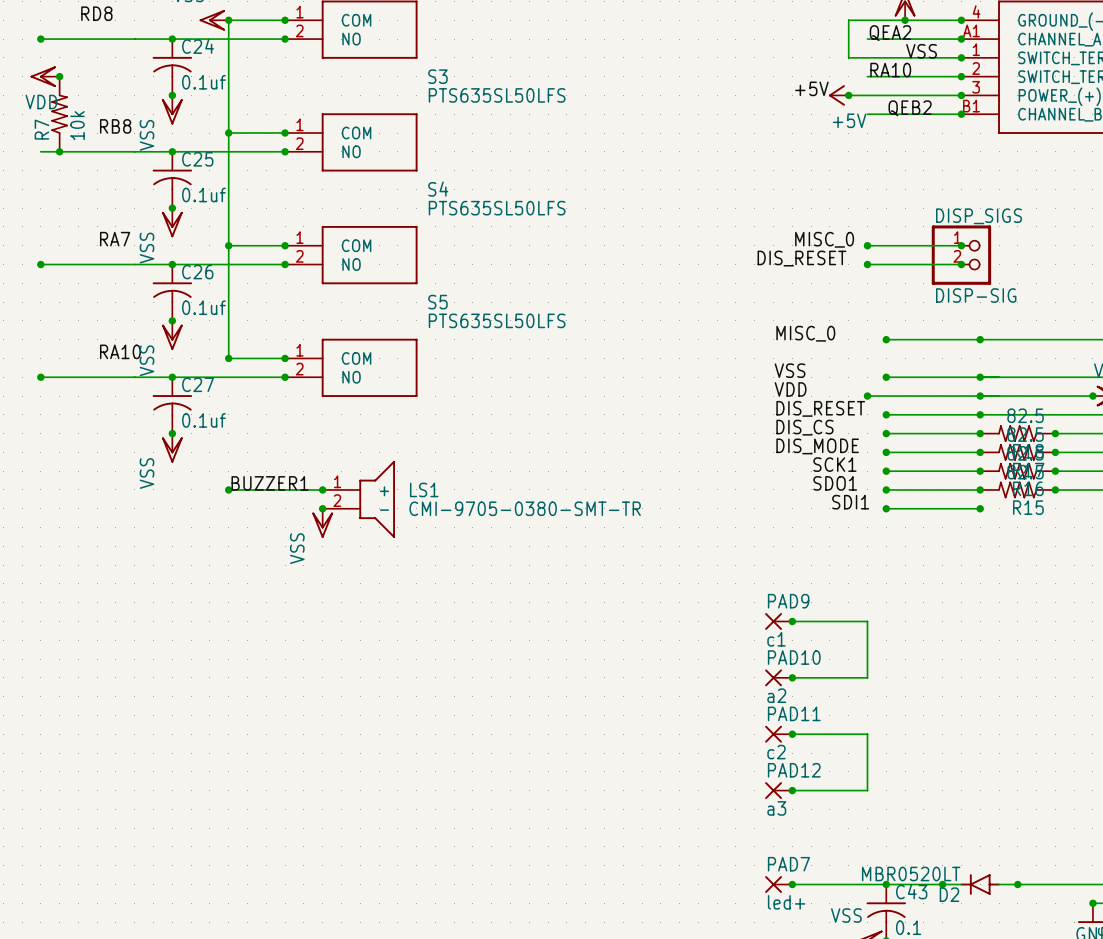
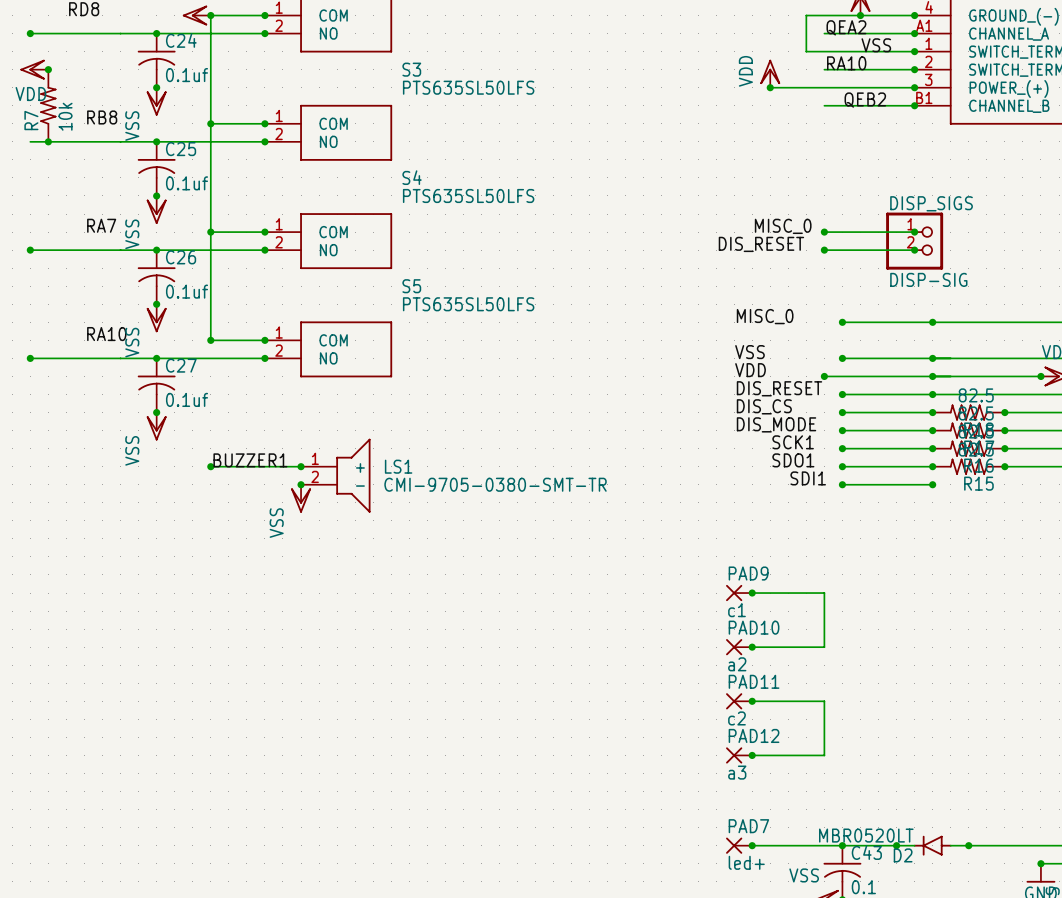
power symbol: none -> VDD (770, 73)
label: +5V (811, 88) -> none
power symbol: +5V (838, 95) -> none
junction position: (848, 95) -> (770, 87)

